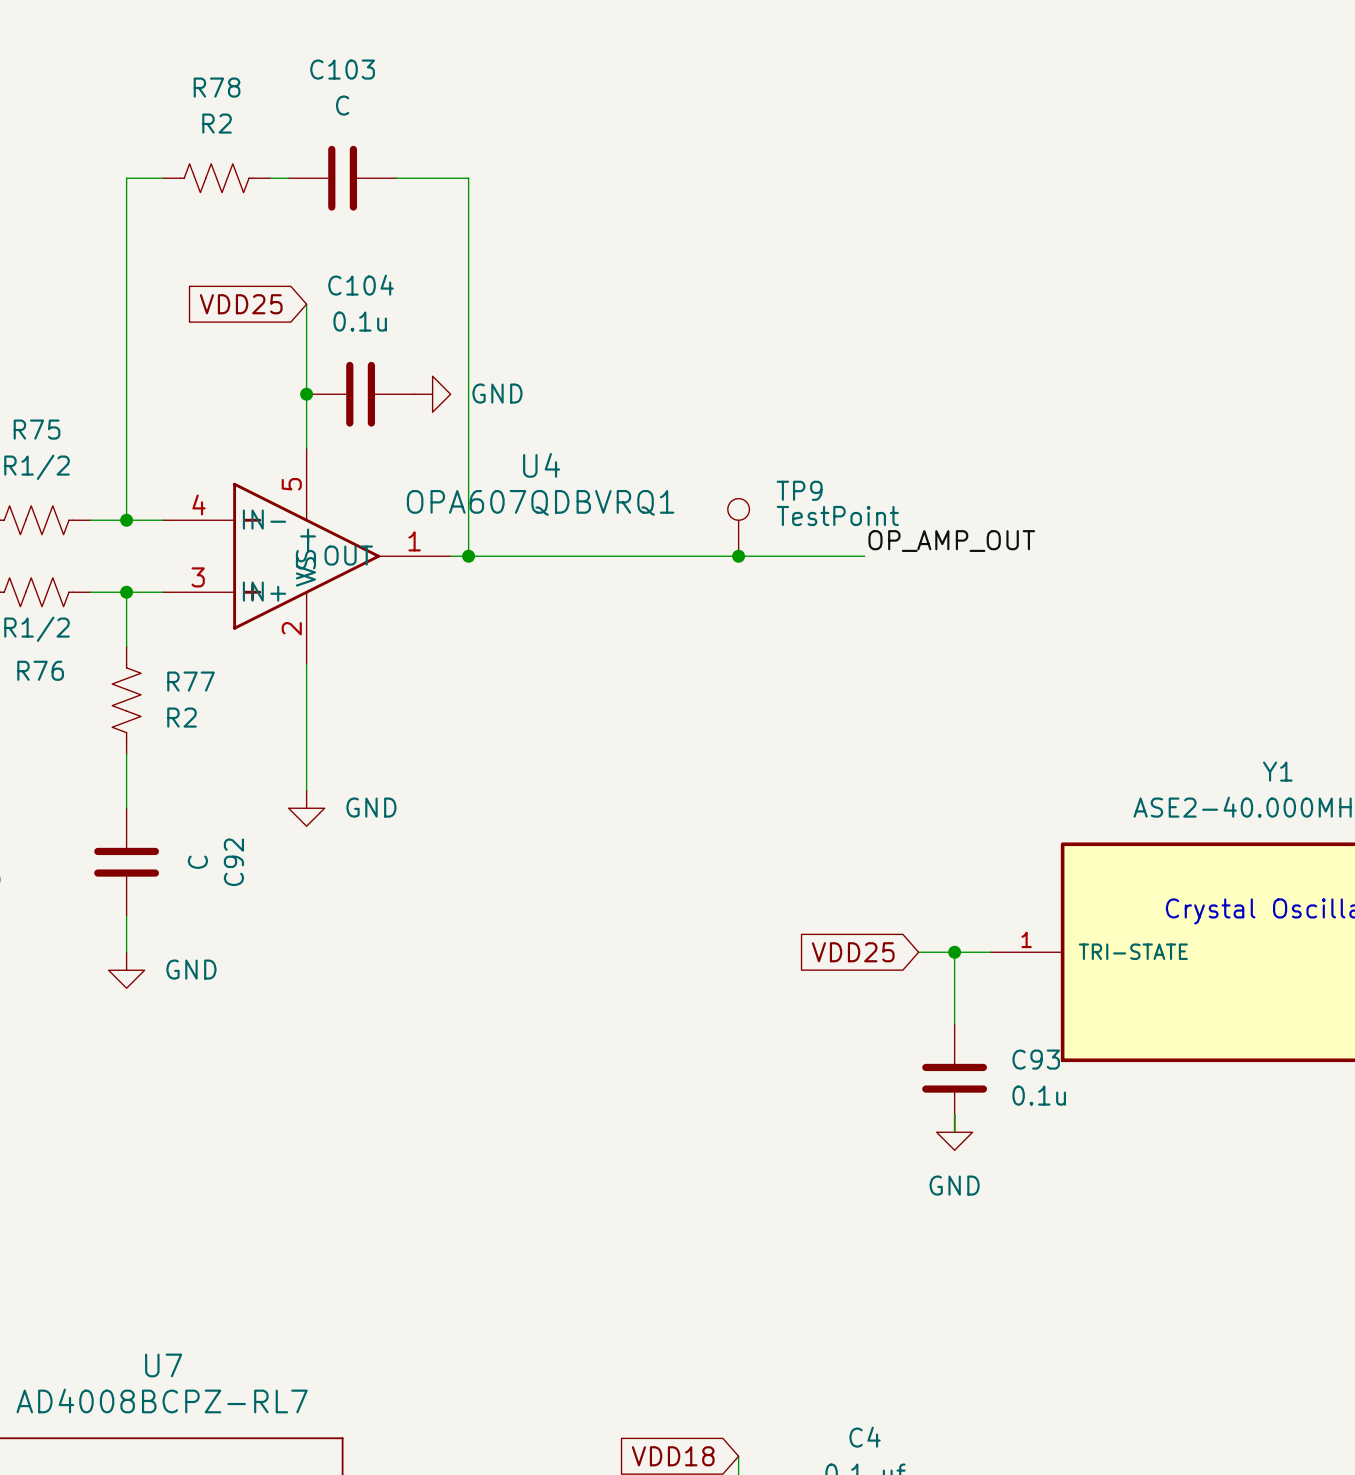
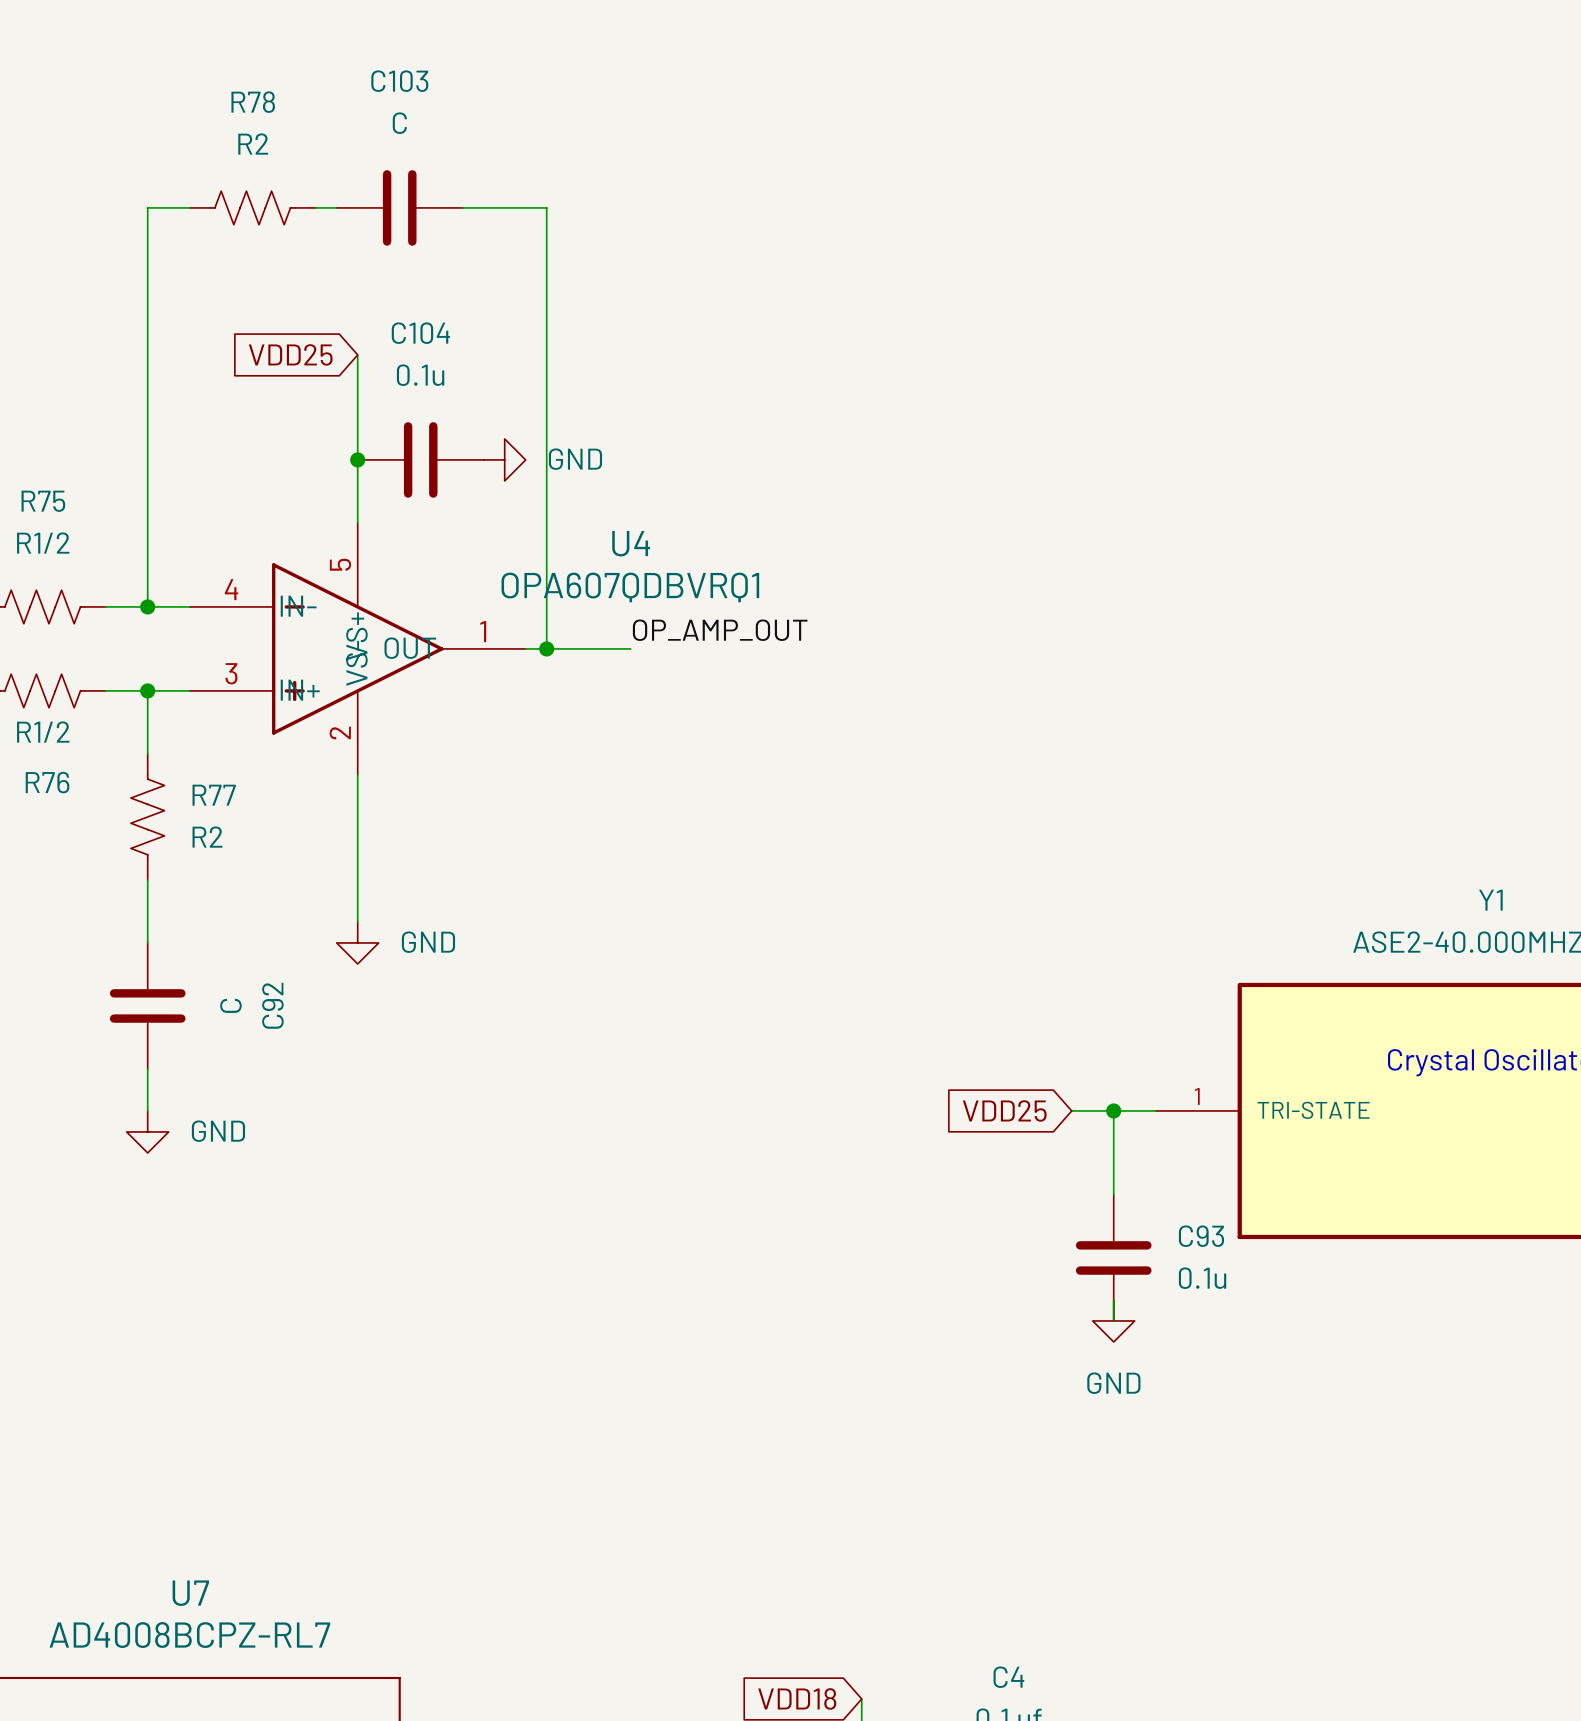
TP9: TestPoint (738, 527) -> none
label position: OP_AMP_OUT (951, 541) -> OP_AMP_OUT (720, 630)
wire: (540, 556) (864, 556) -> none
junction: (738, 556) -> none

